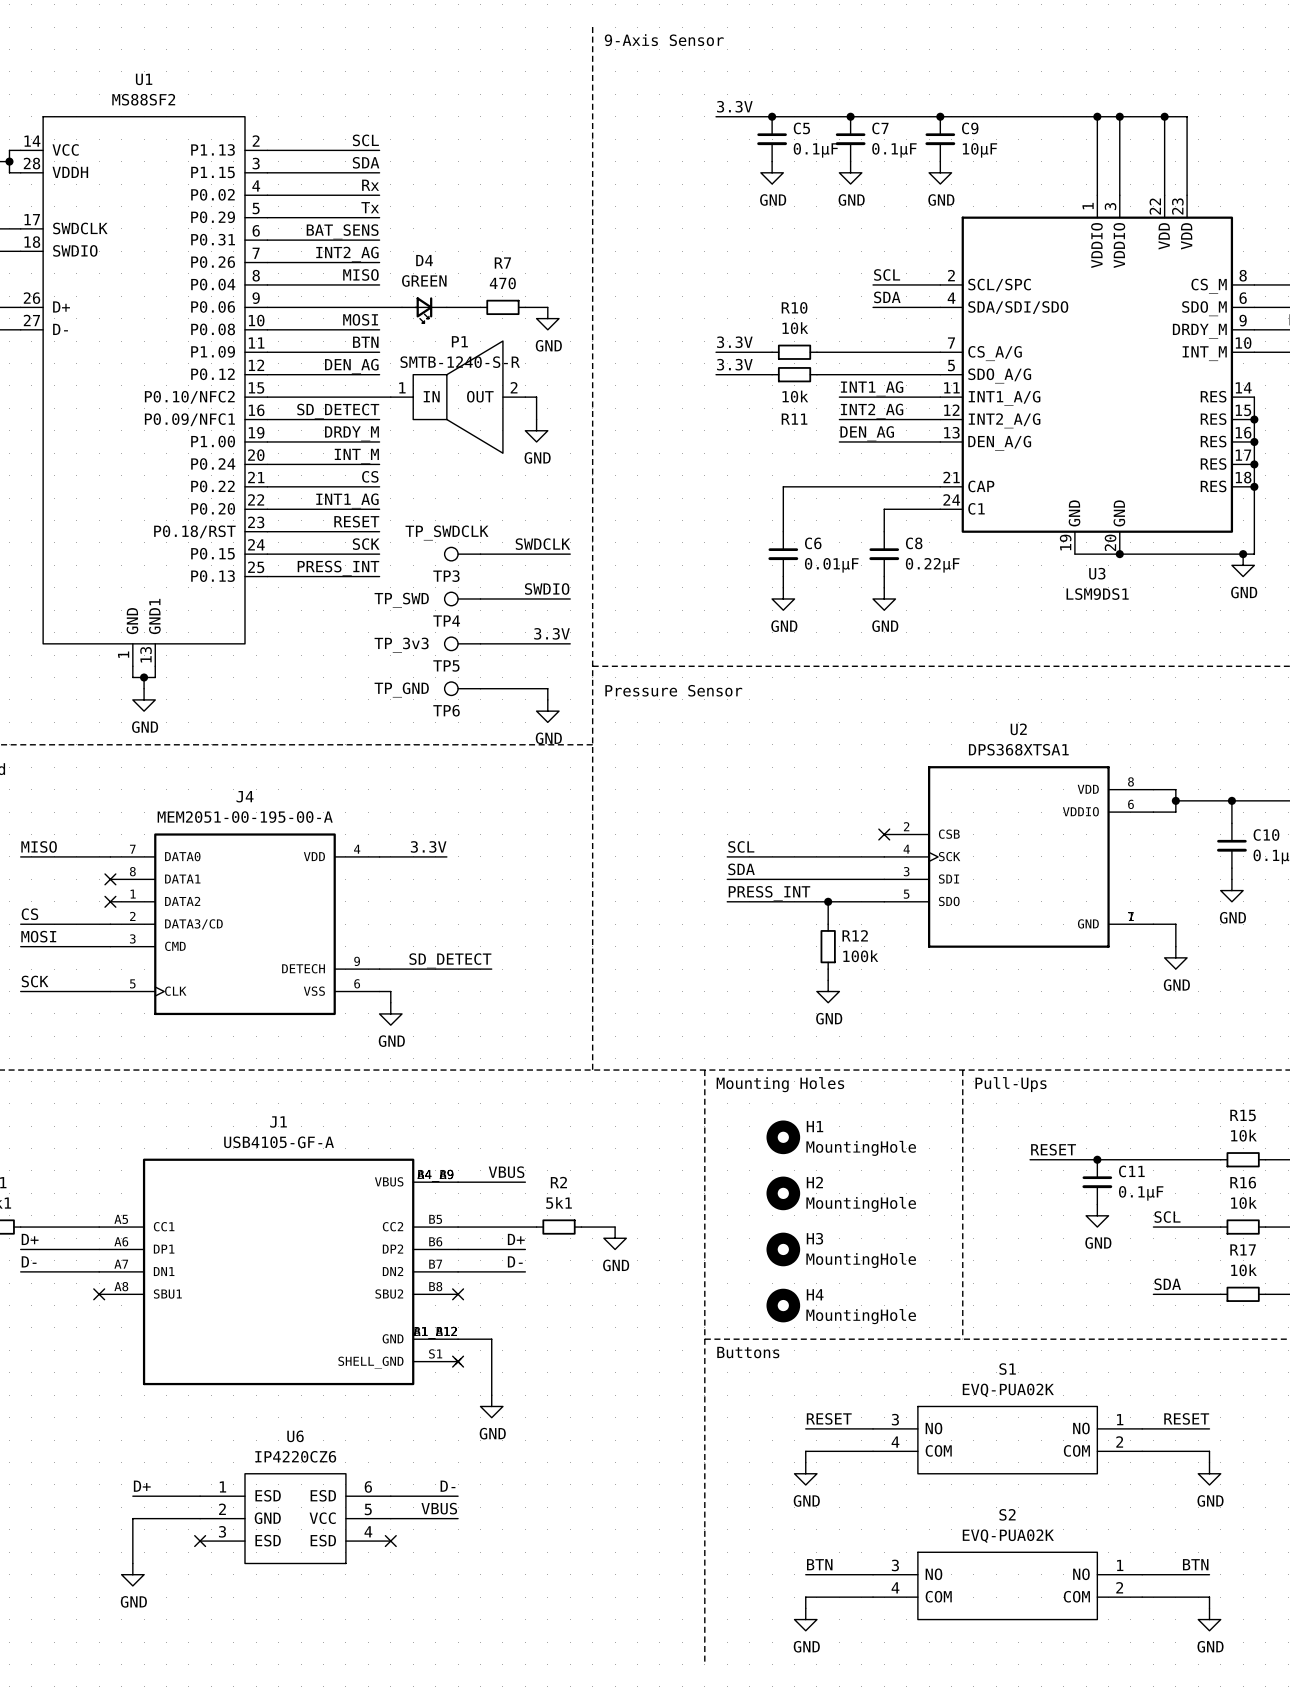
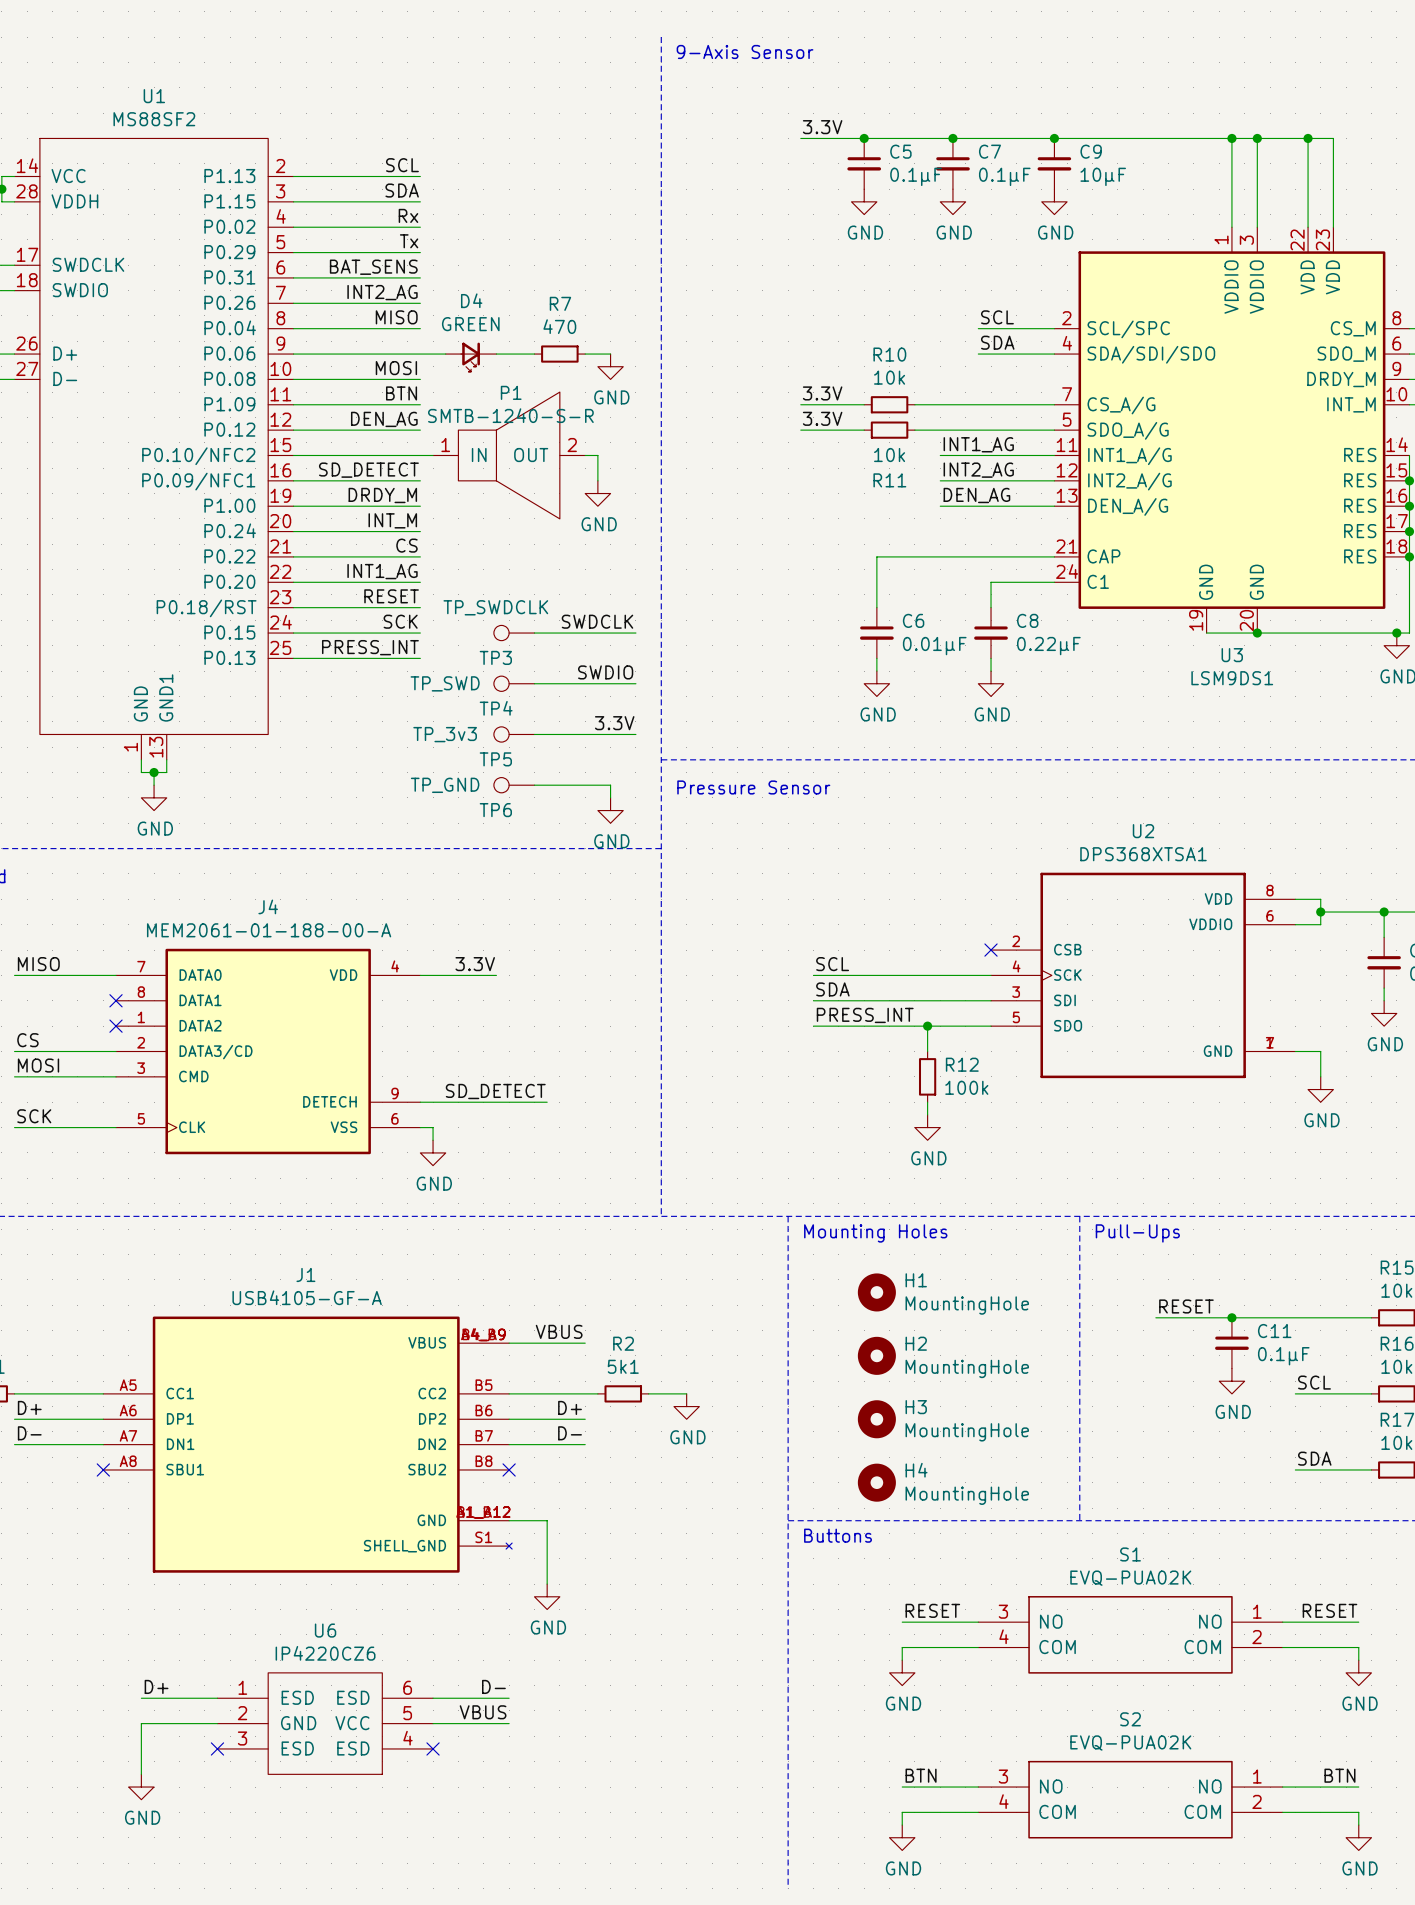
J4 value: MEM2051-00-195-00-A (245, 817) -> MEM2061-01-188-00-A (269, 930)
no-connect mark: (458, 1361) -> none

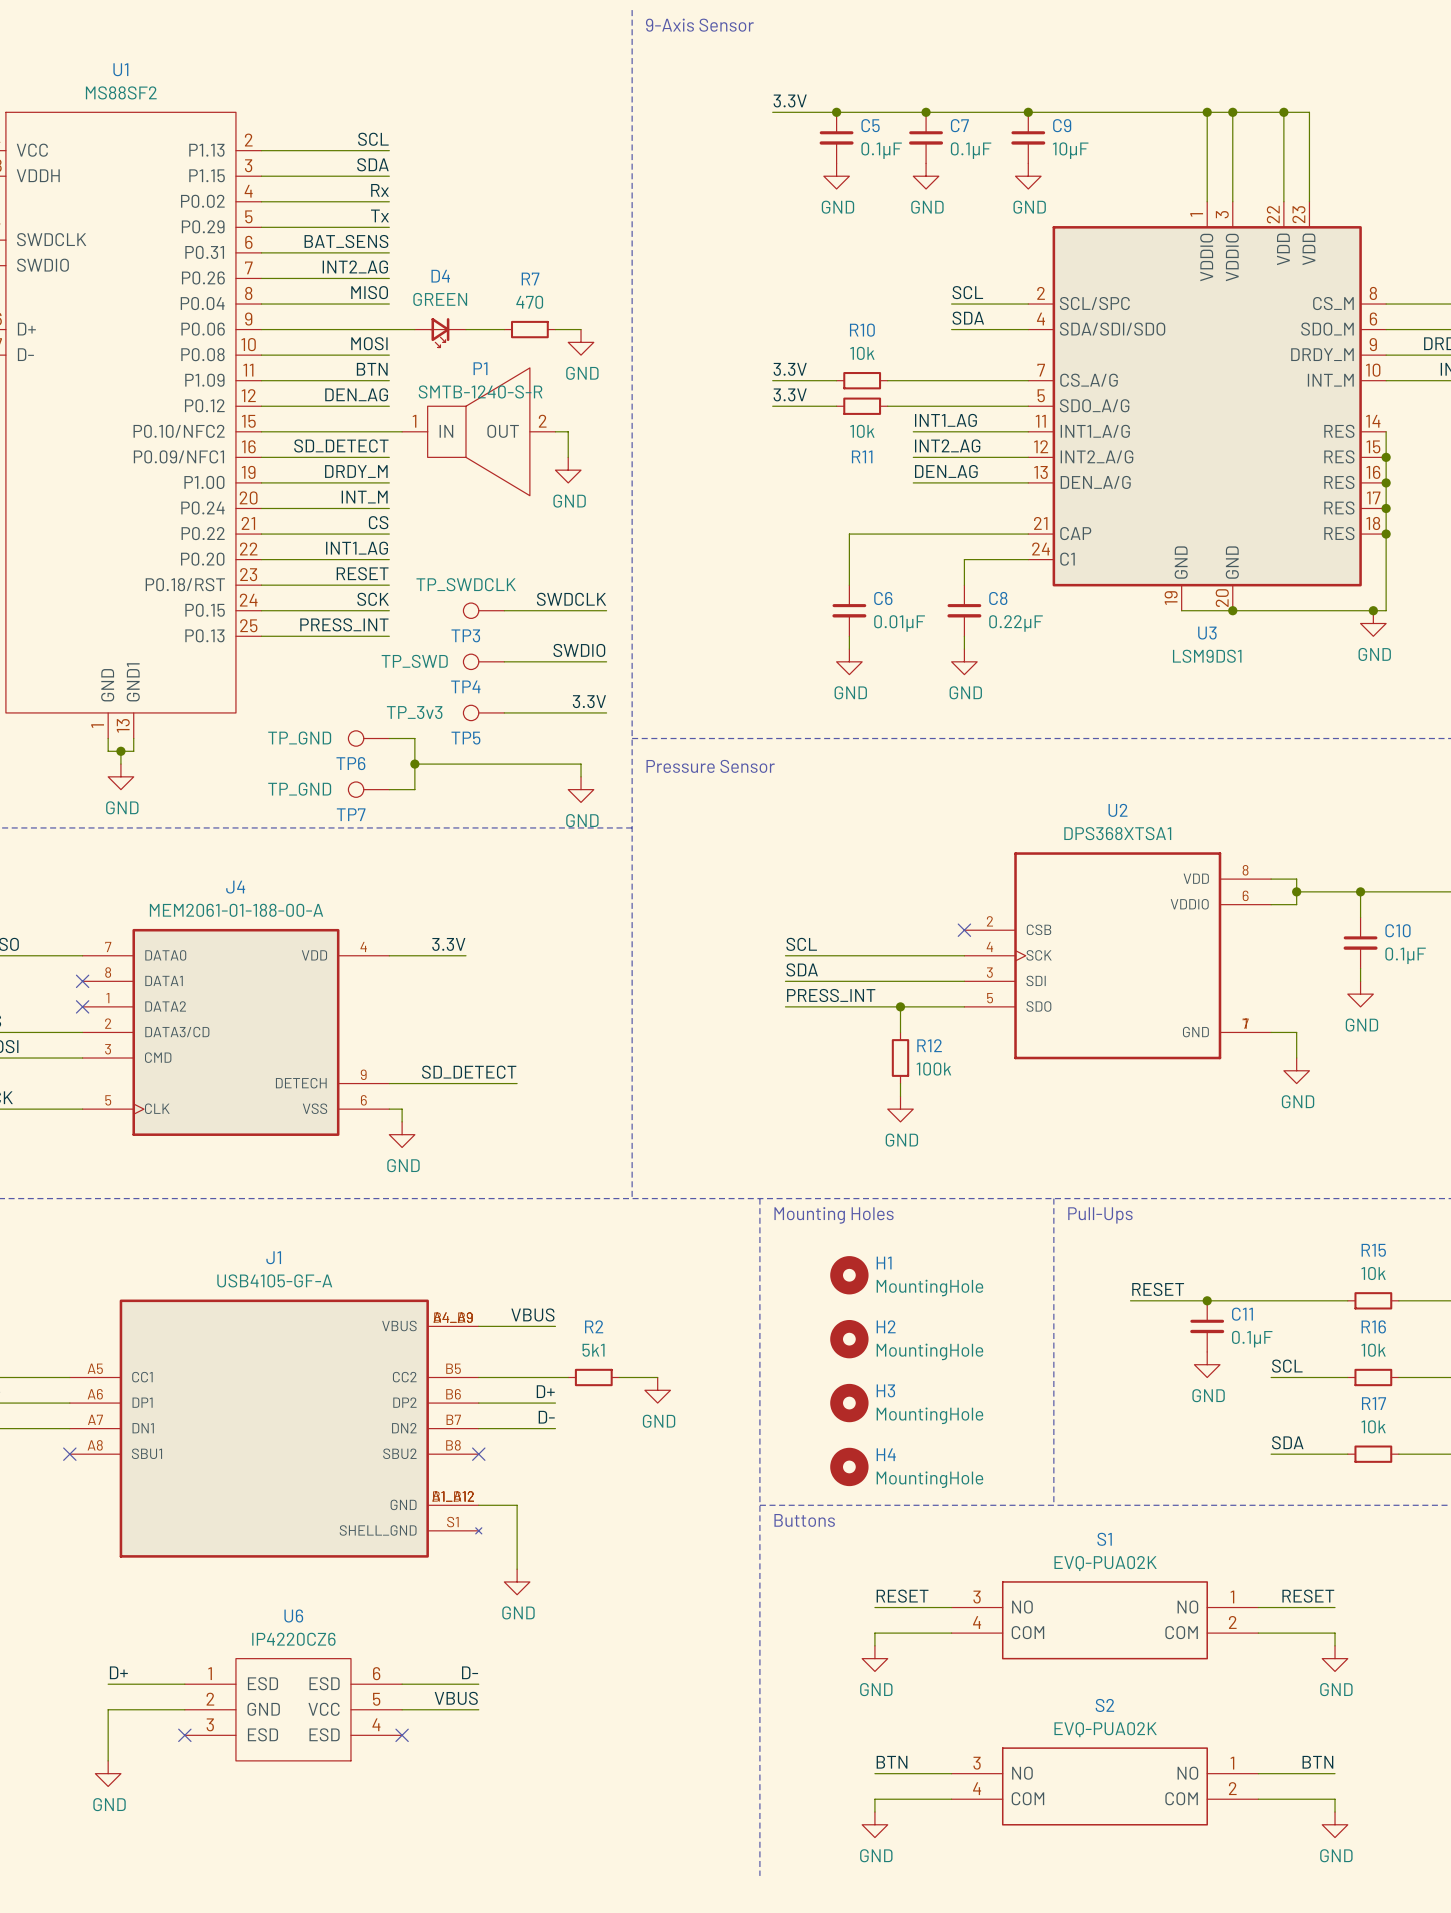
wire: none -> (389, 738) (414, 738) (414, 789) (389, 789)
wire: none -> (414, 764) (504, 764)
junction: none -> (414, 764)
TP6 position: (514, 785) -> (368, 738)
TP7: none -> TP_GND (368, 789)

